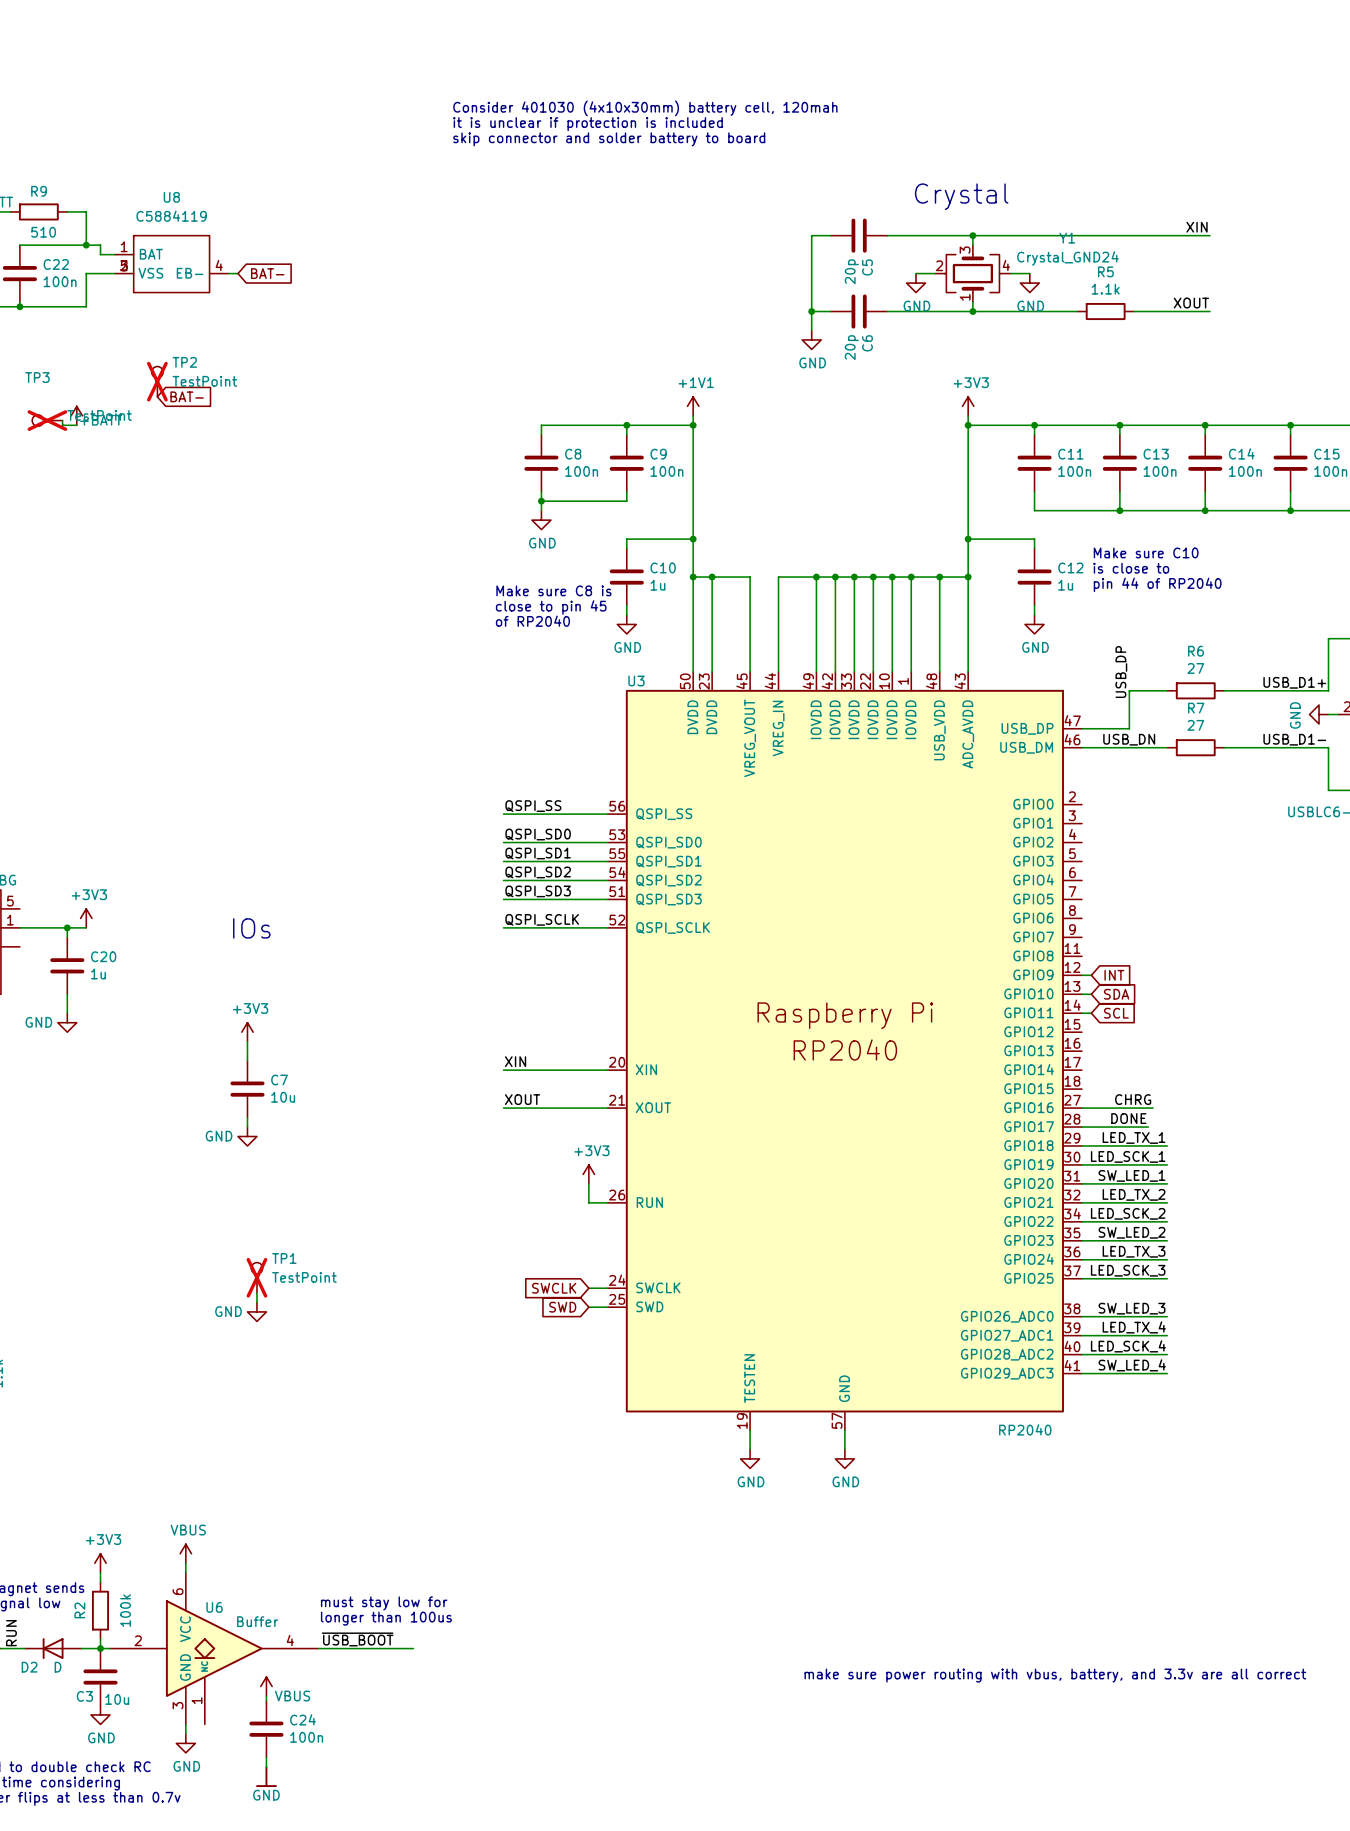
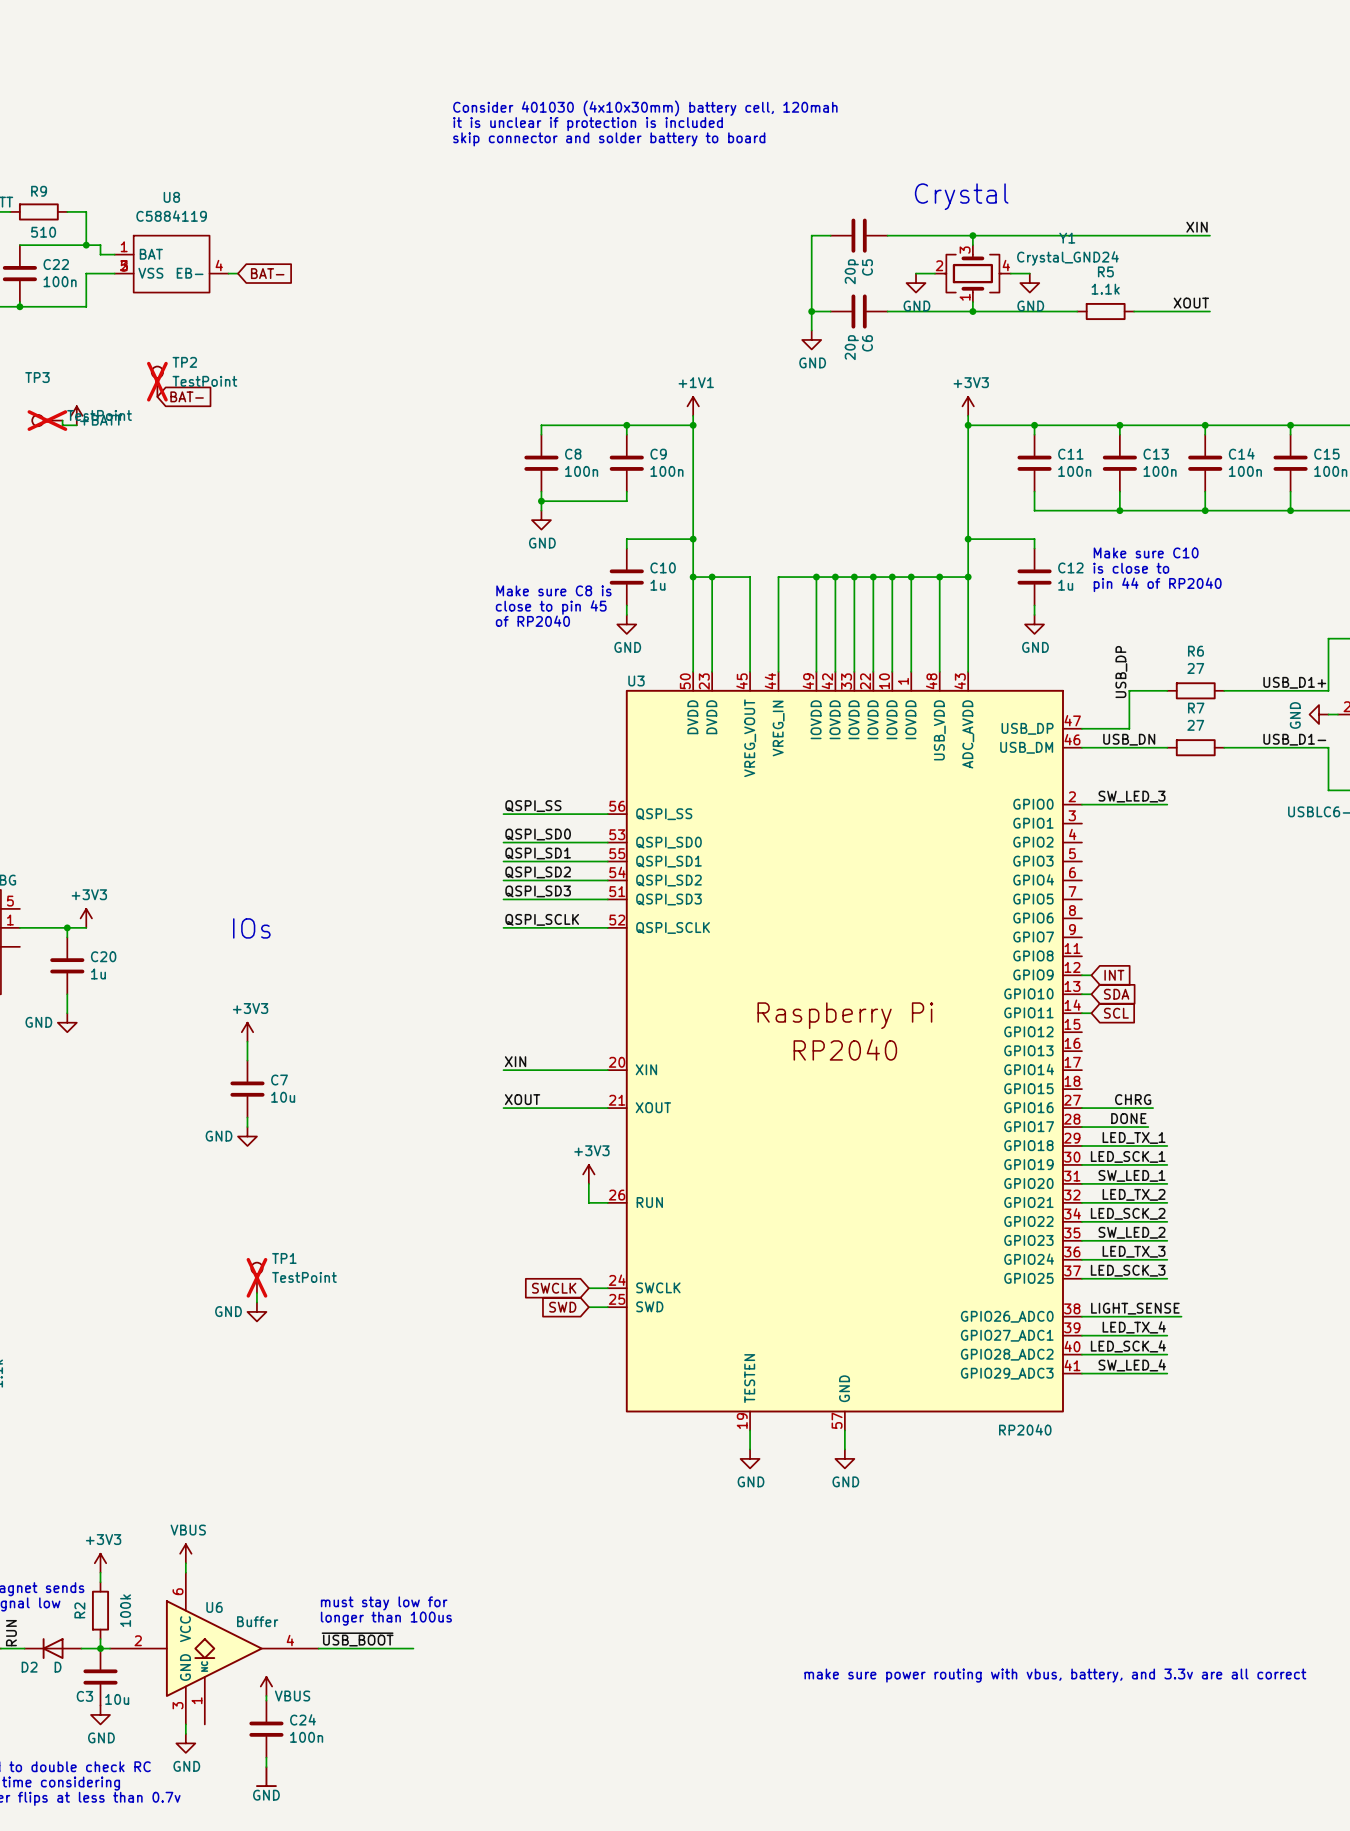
label: none -> SW_LED_3 (1132, 796)
wire: none -> (1081, 804) (1167, 804)
label: SW_LED_3 (1132, 1308) -> none
label: none -> LIGHT_SENSE (1135, 1308)
wire: none -> (1167, 1316) (1181, 1316)

